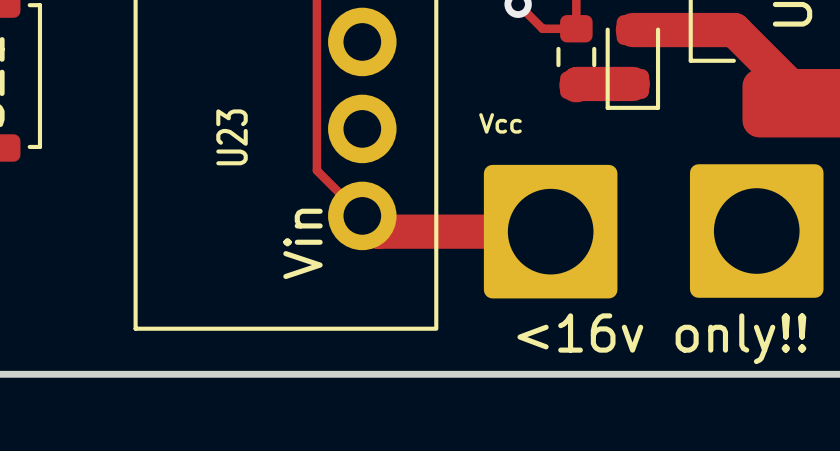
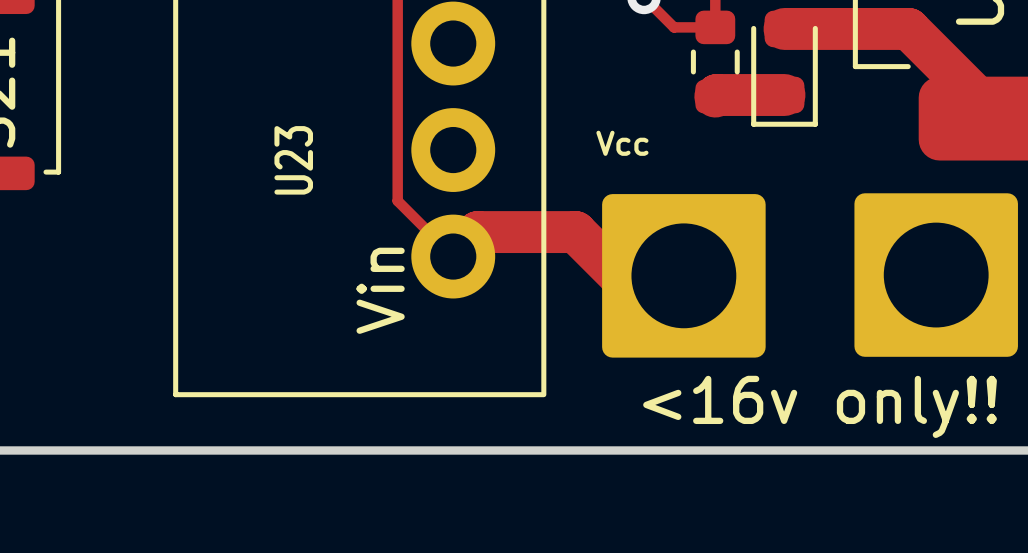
track: (362, 215) (378, 231) (497, 231) -> (453, 256) (477, 232) (575, 232) (619, 275)

